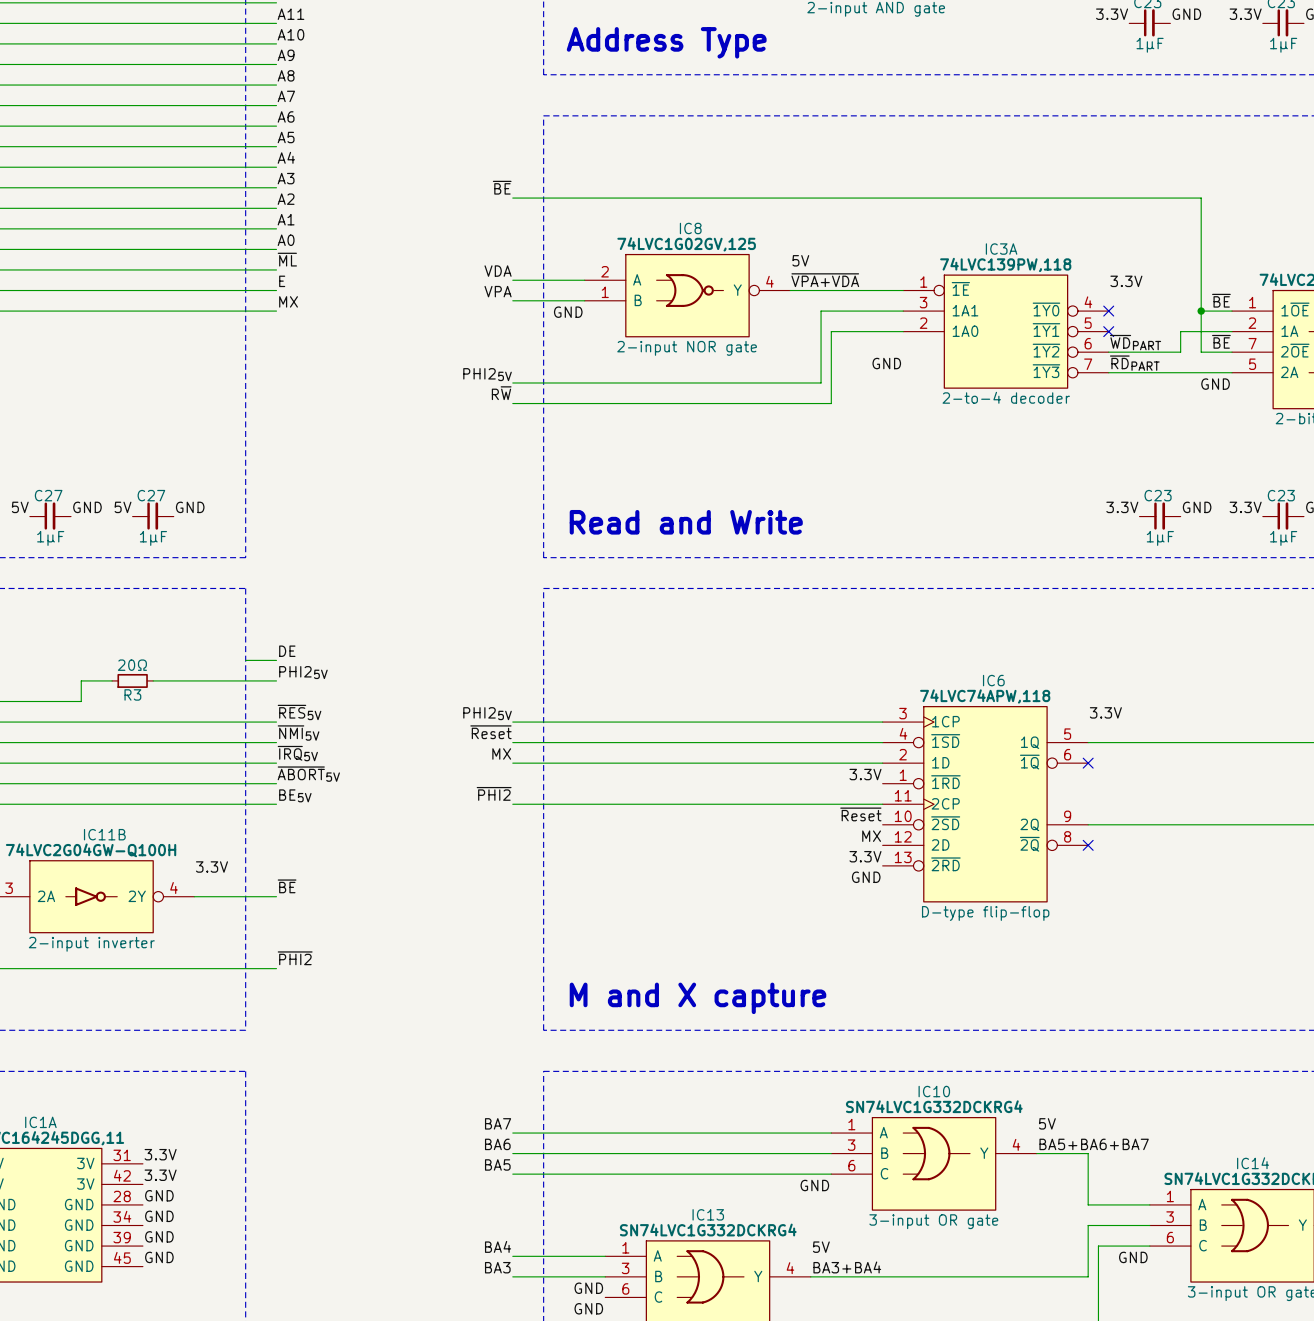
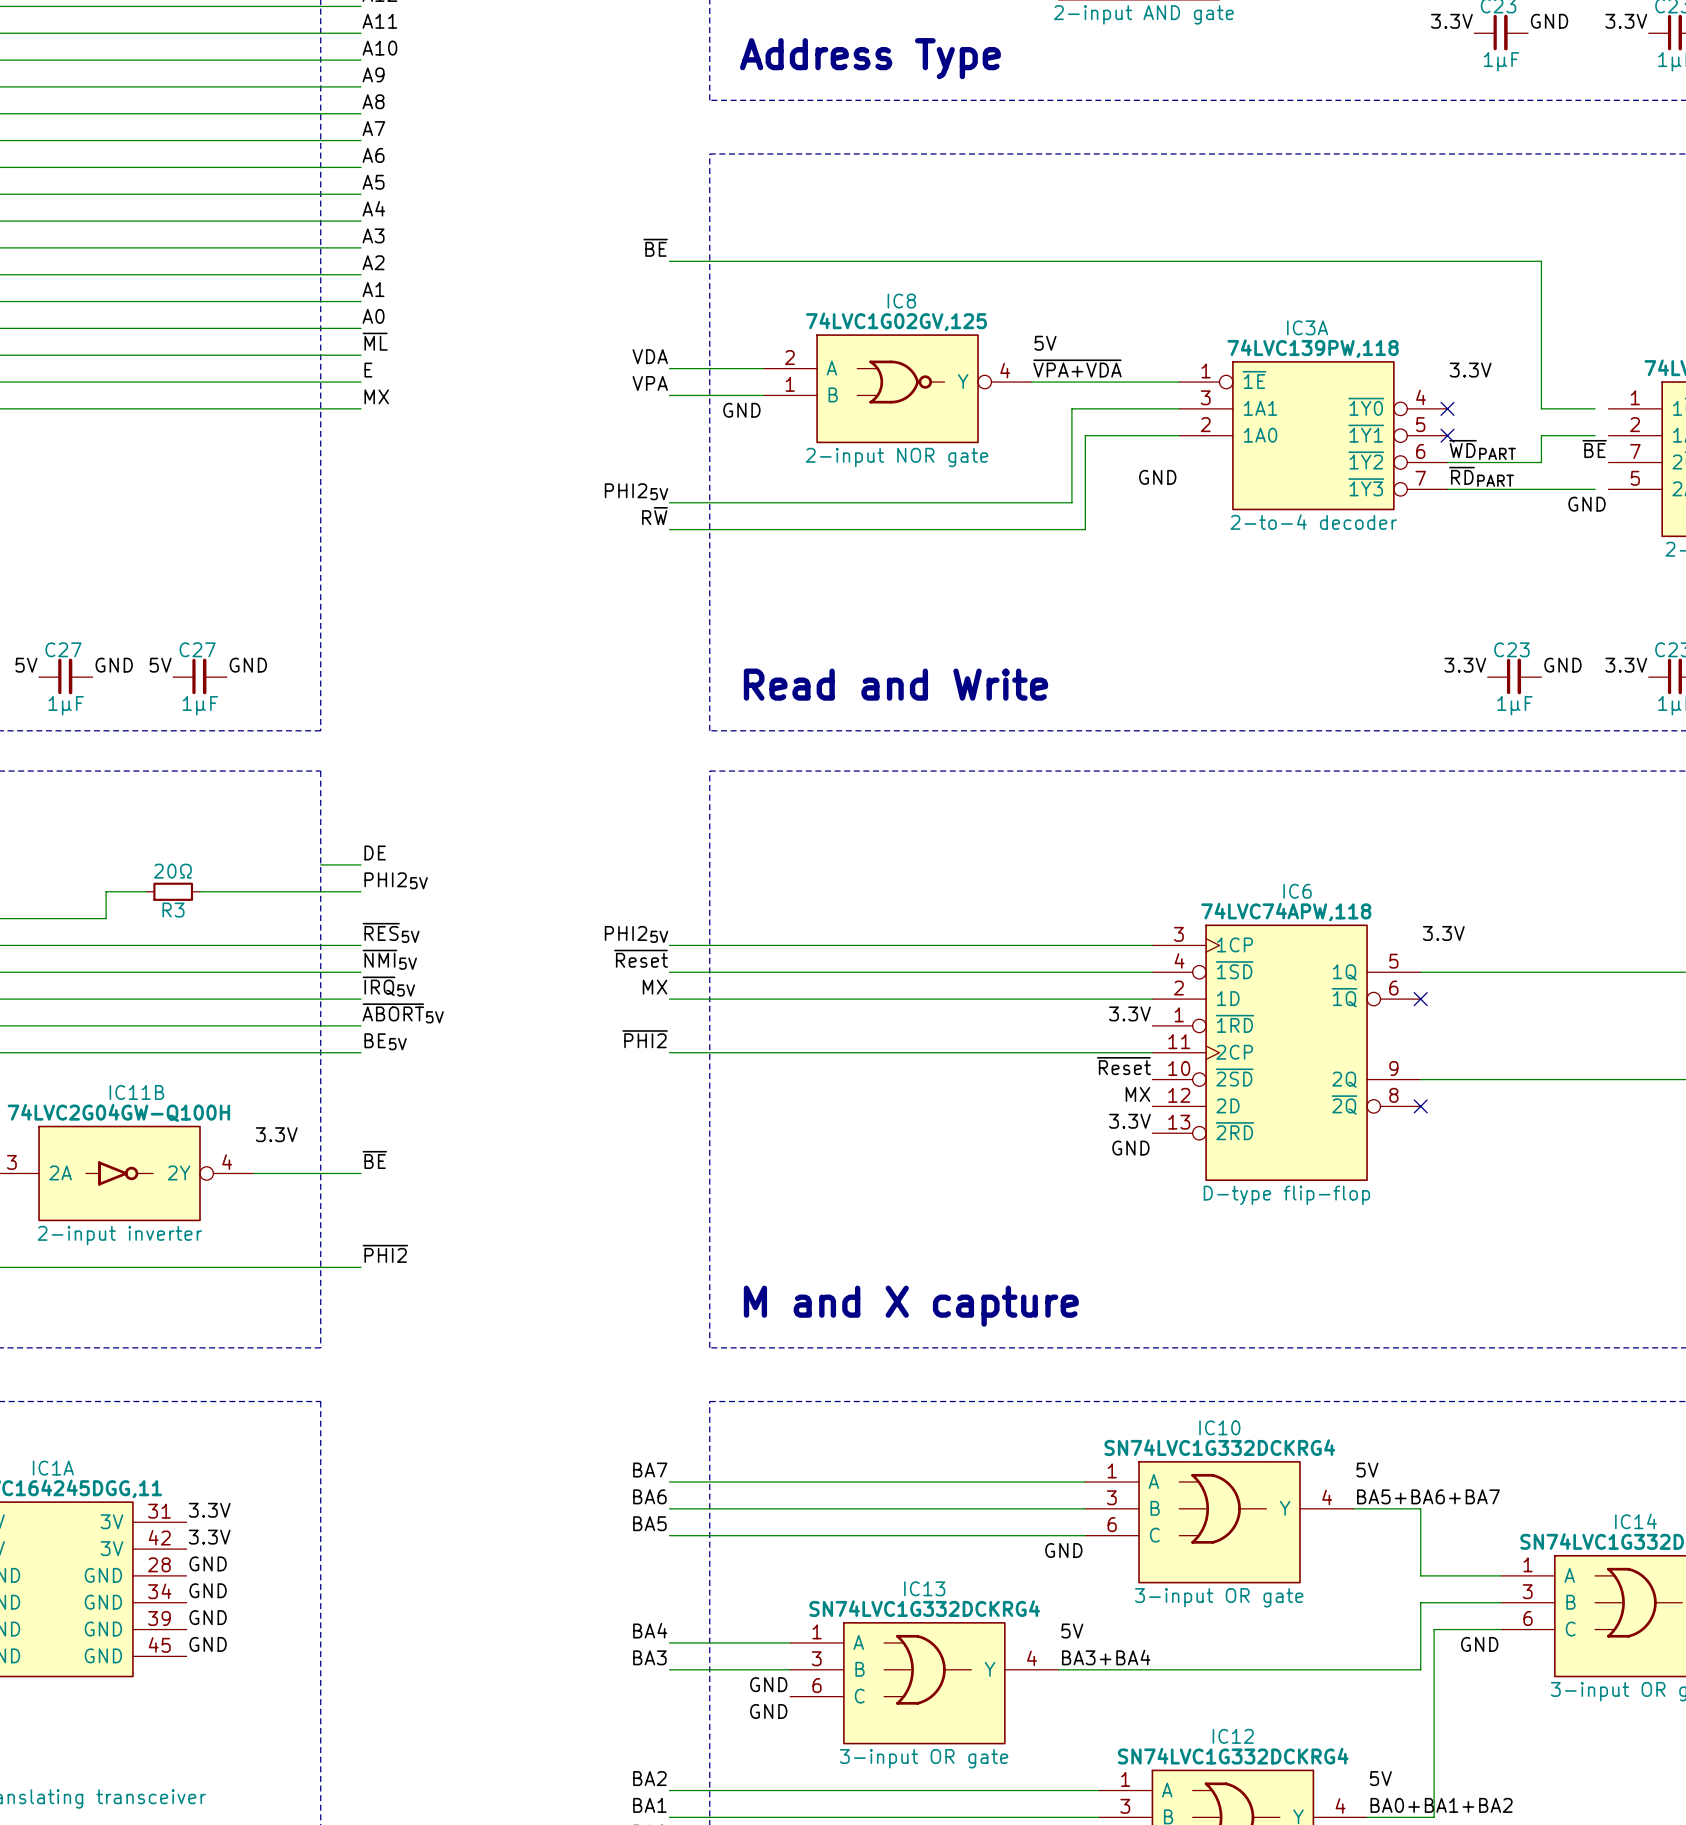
wire: (1180, 198) (1201, 198) (1201, 352) (1232, 352) -> (1541, 261) (1541, 408) (1568, 408)
label: ~{BE} (1221, 300) -> none
junction: (1201, 311) -> none
wire: (1221, 311) (1232, 311) -> none
wire: (1221, 331) (1232, 331) -> none
wire: (1221, 372) (1232, 372) -> none

